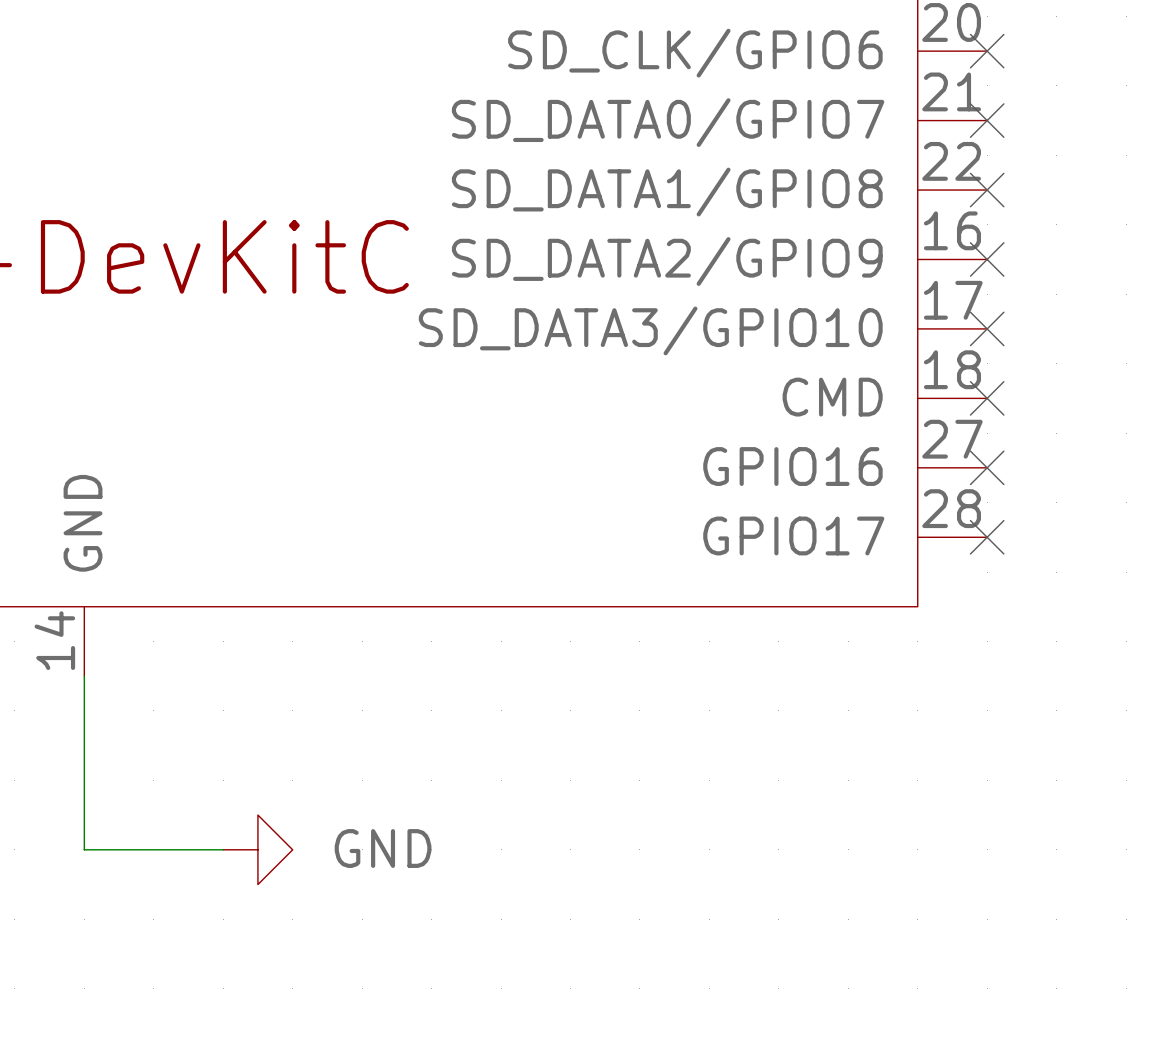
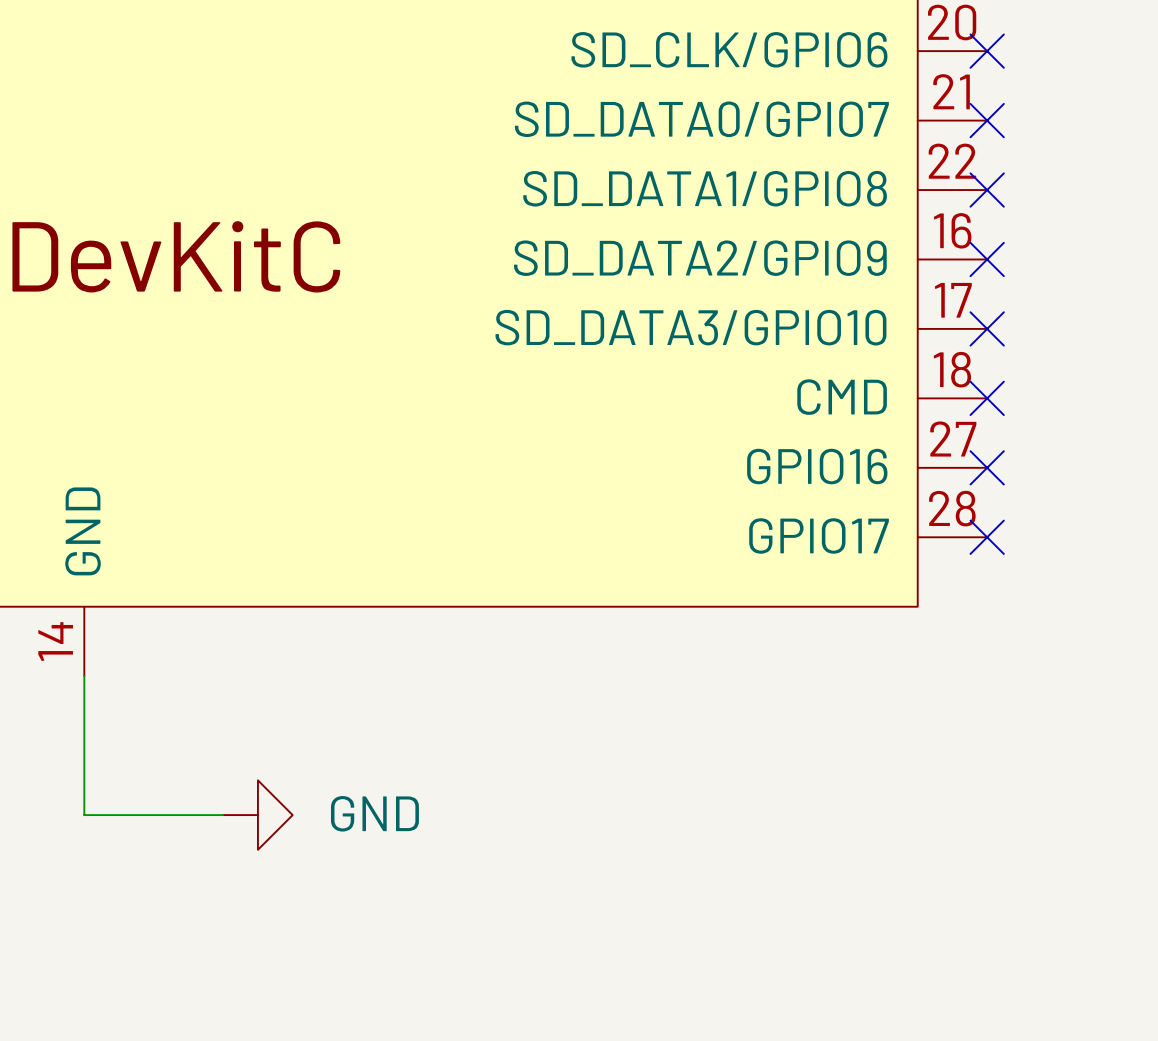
wire: (84, 815) (84, 849) (223, 849) -> (84, 815) (223, 815)
power symbol position: GND (257, 849) -> GND (257, 815)

